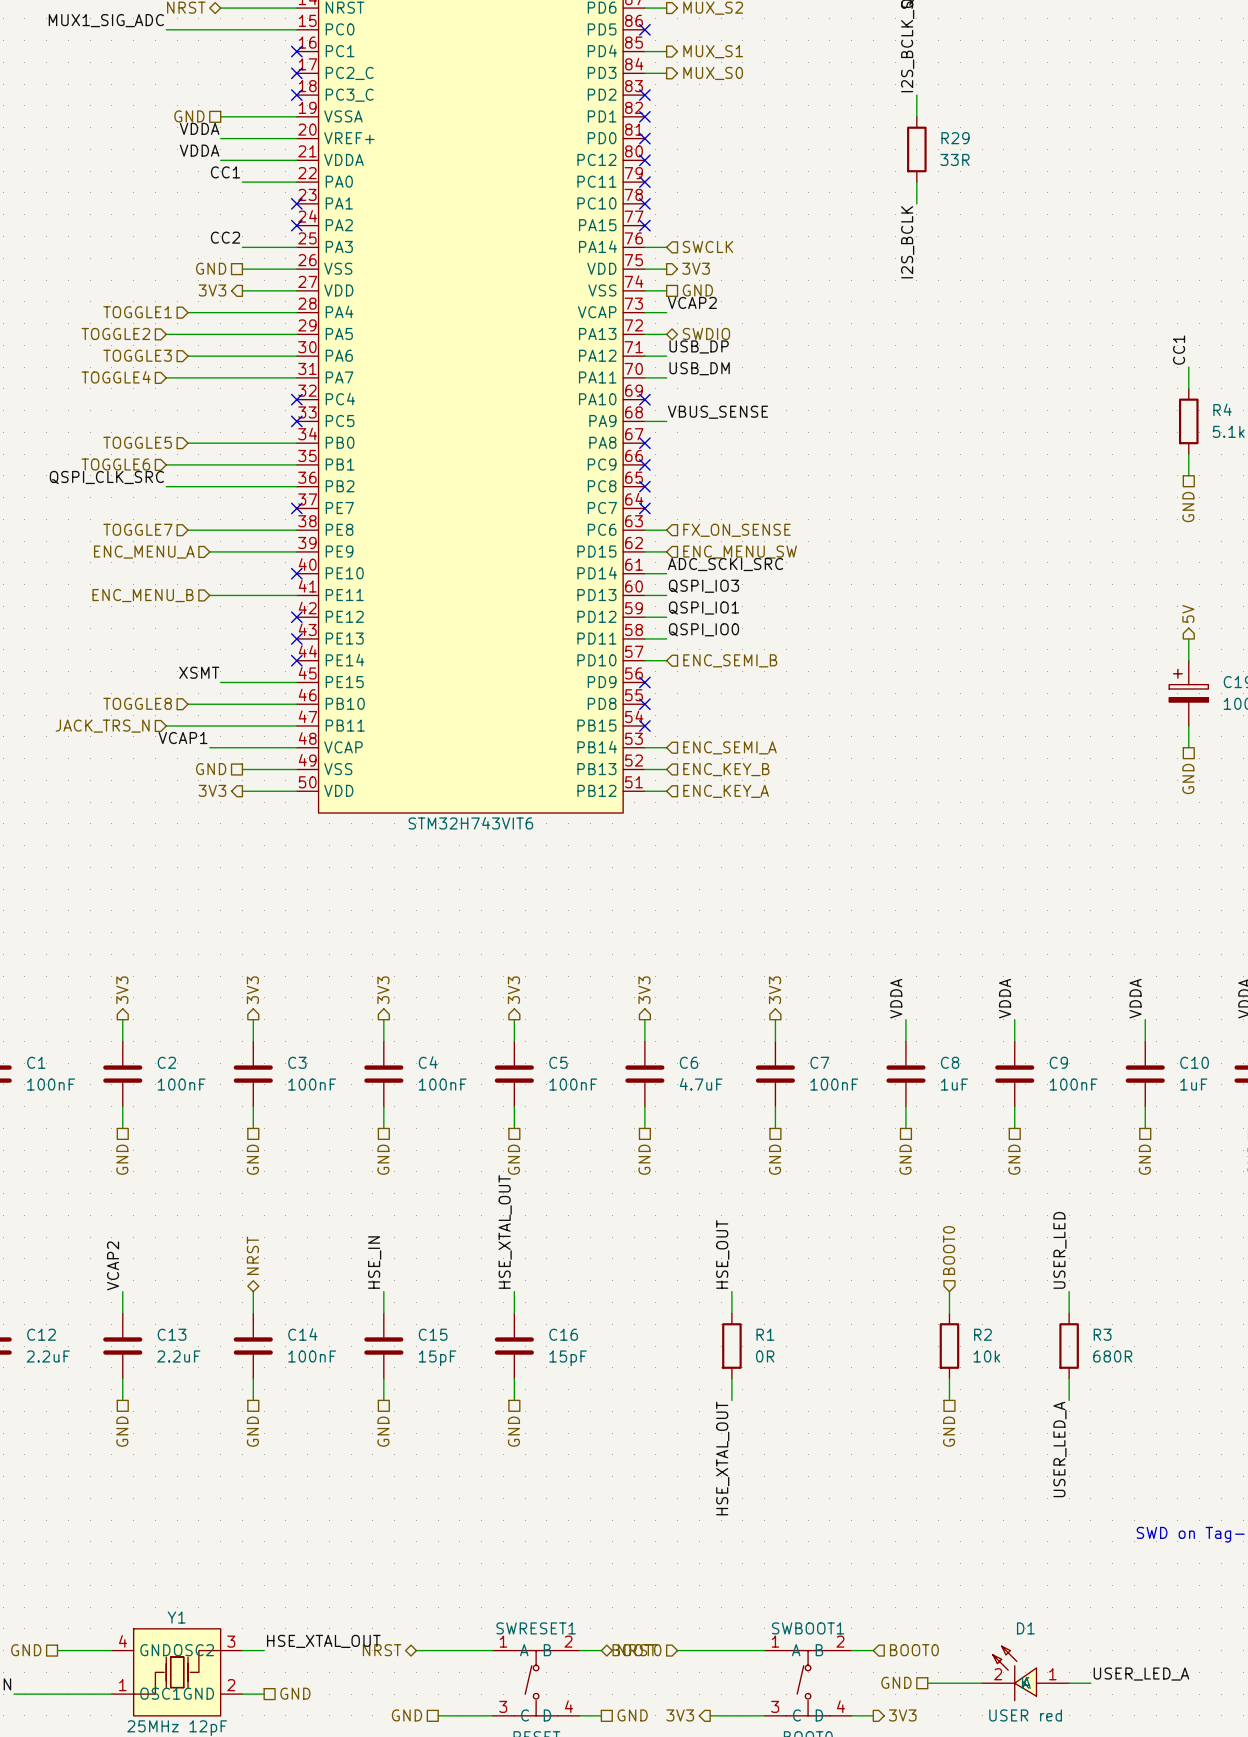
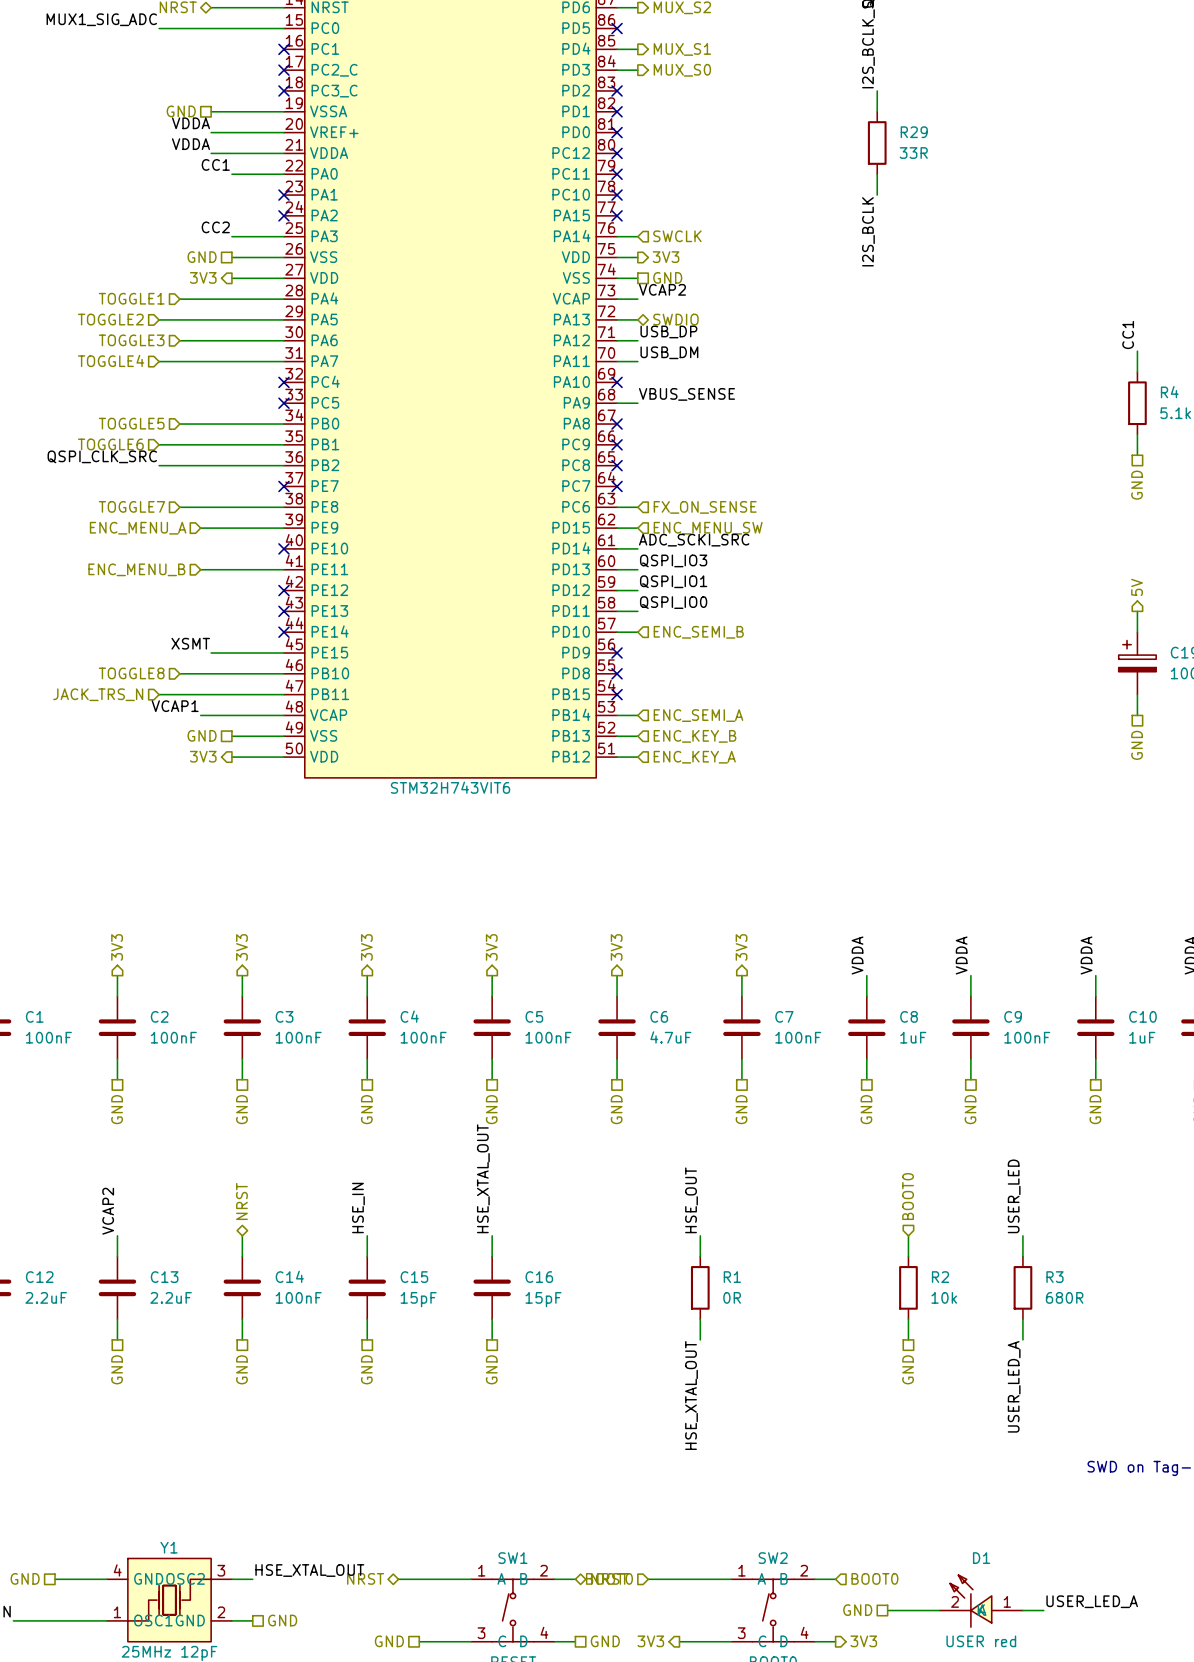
SWRESET1 name: SWRESET1 (536, 1628) -> SW1 (512, 1558)
SWBOOT1 name: SWBOOT1 (808, 1628) -> SW2 (773, 1558)

